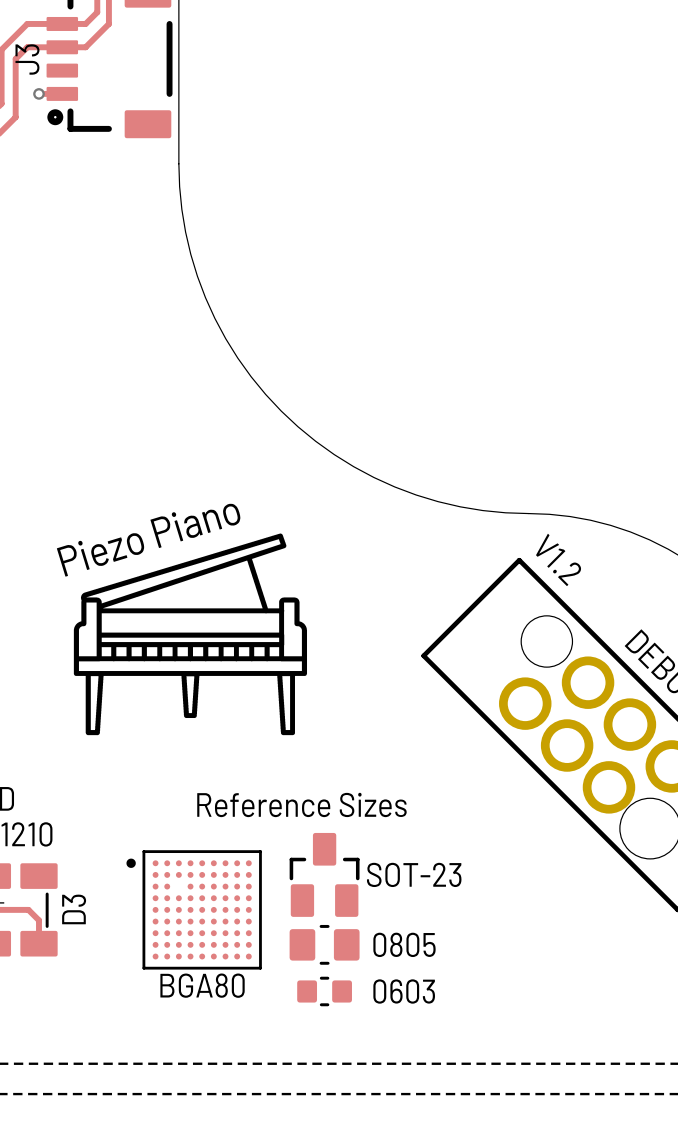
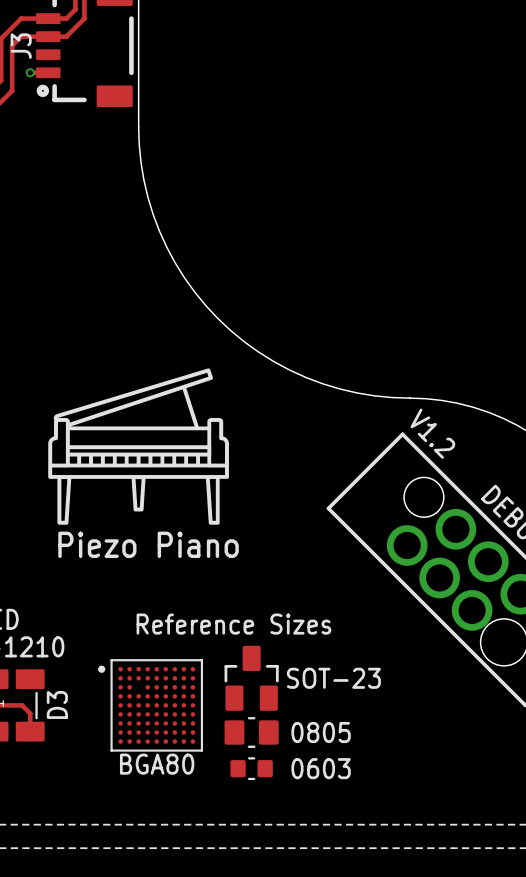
text rotation: 0° (148, 540) -> 17° clockwise (148, 544)
drawing position: (190, 634) -> (138, 446)

